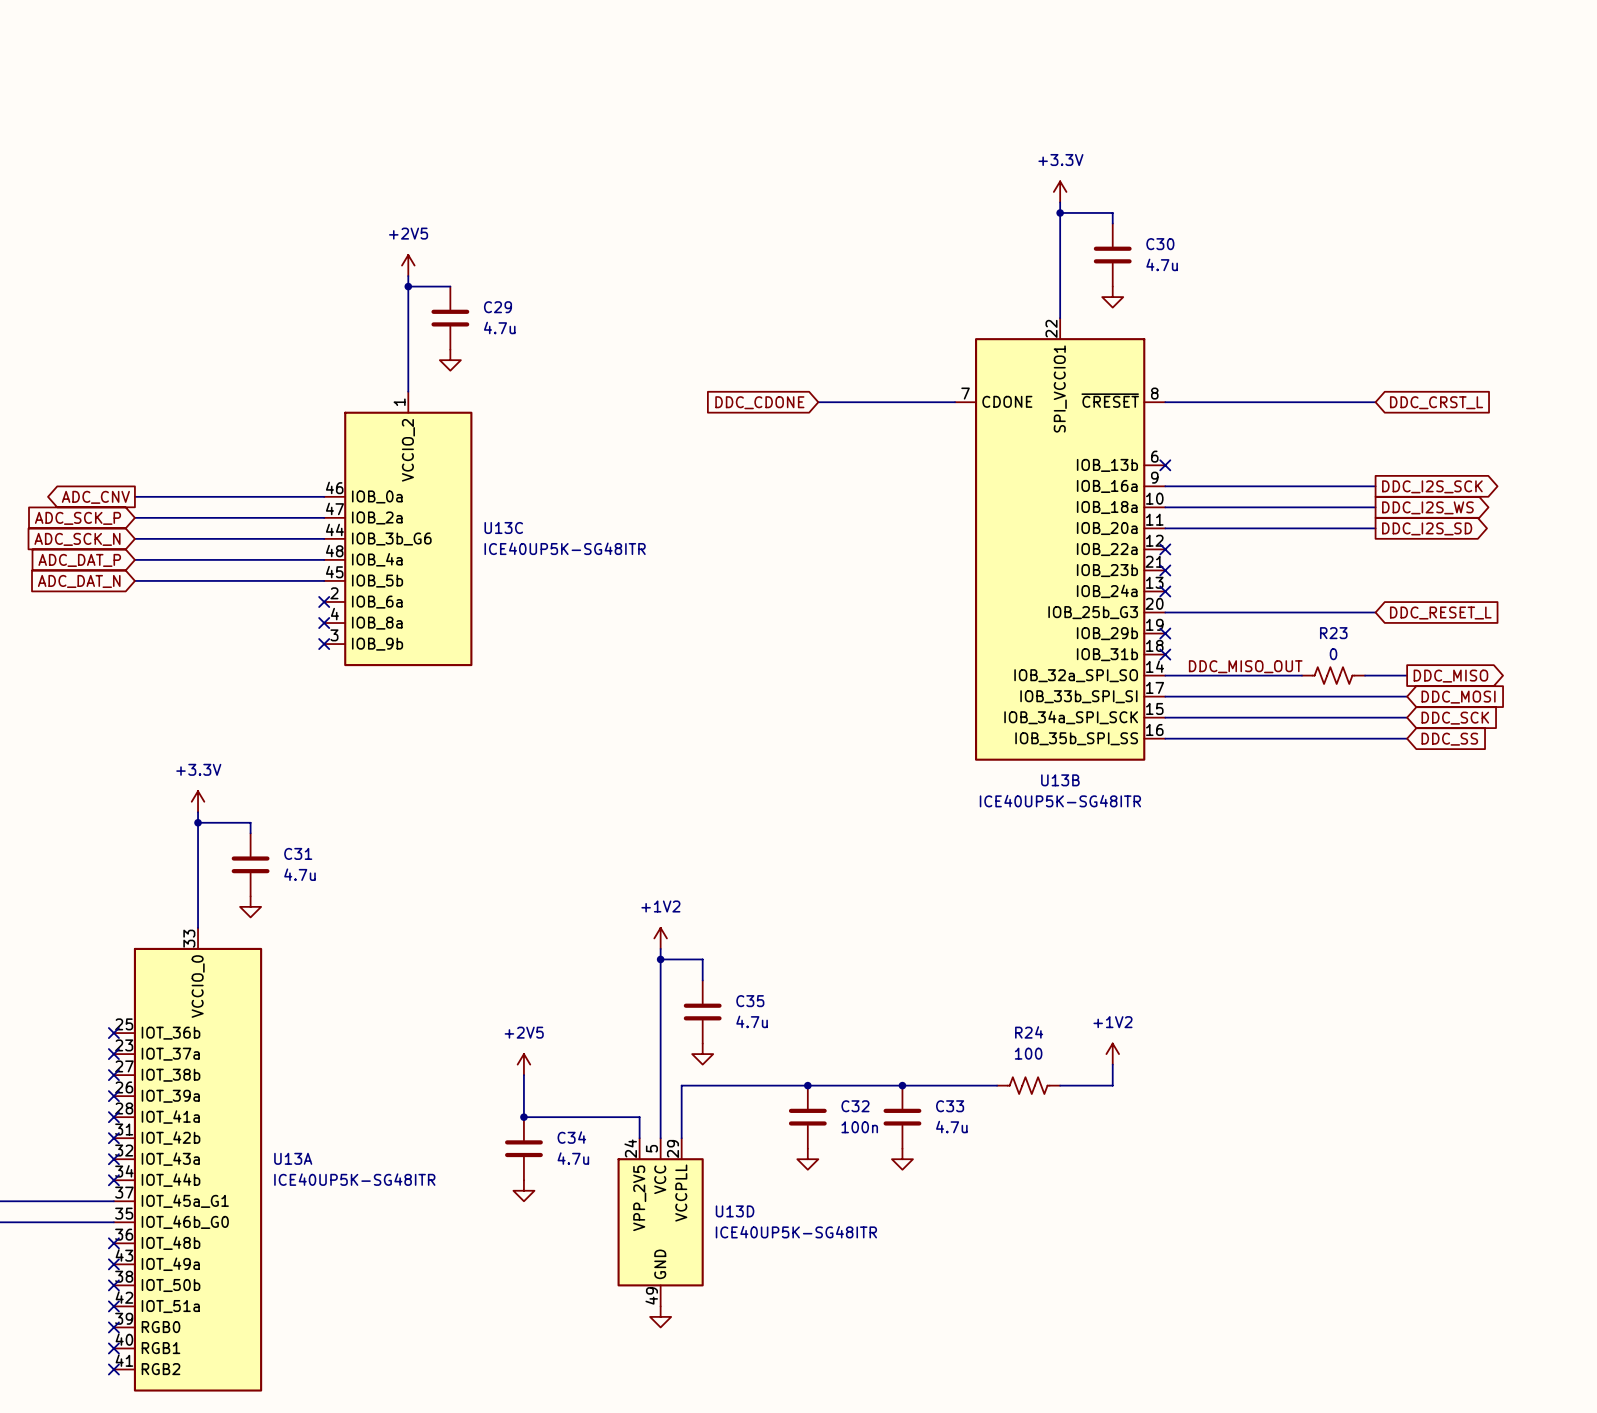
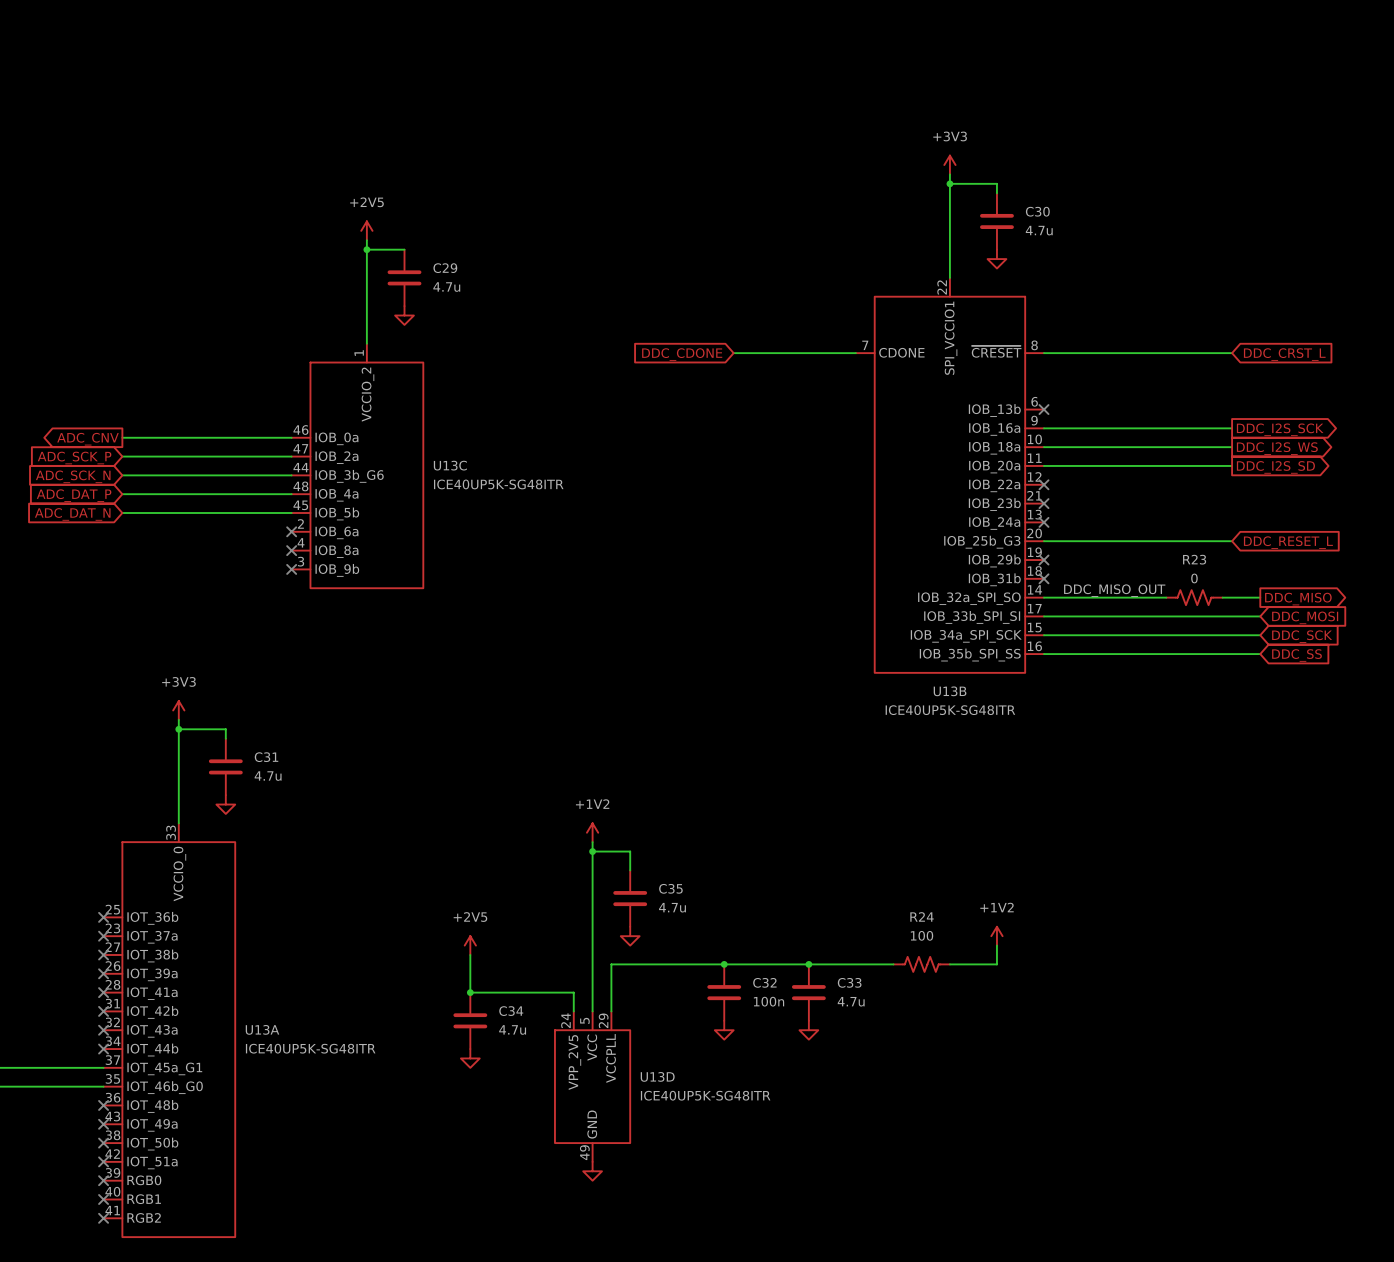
power symbol: +3.3V (1060, 191) -> +3V3 (949, 165)
power symbol: +3.3V (198, 801) -> +3V3 (178, 710)

